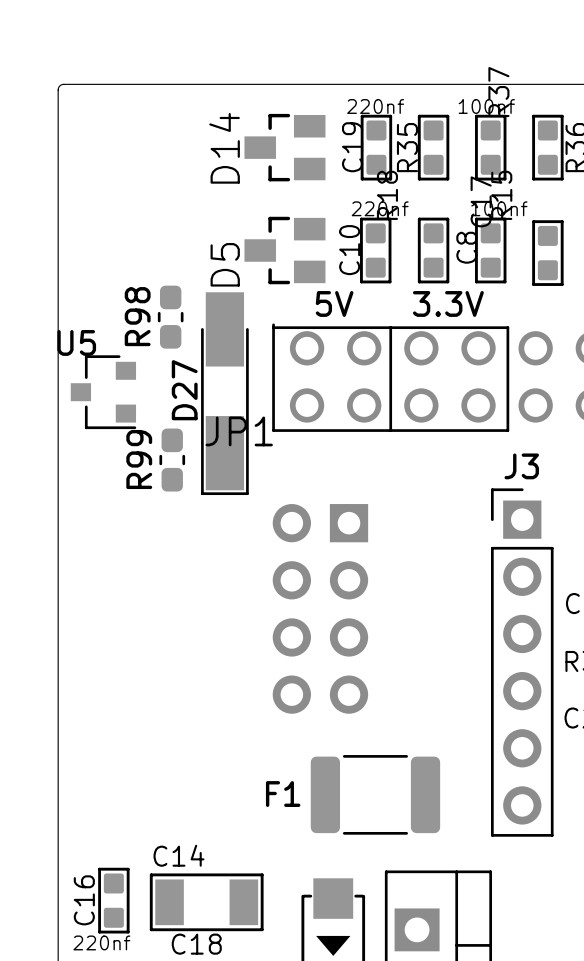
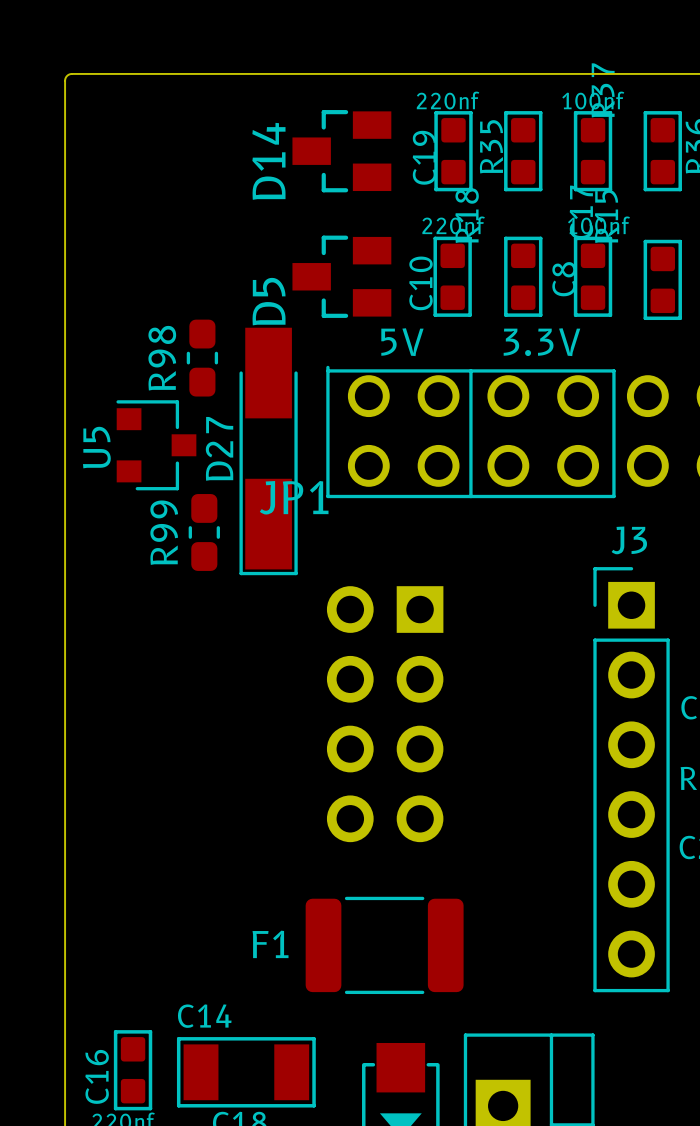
U5 name position: U5 (76, 342) -> U5 (96, 447)
U5 rotation: 0° (103, 392) -> 180° (156, 445)
F1 position: (375, 794) -> (384, 945)

